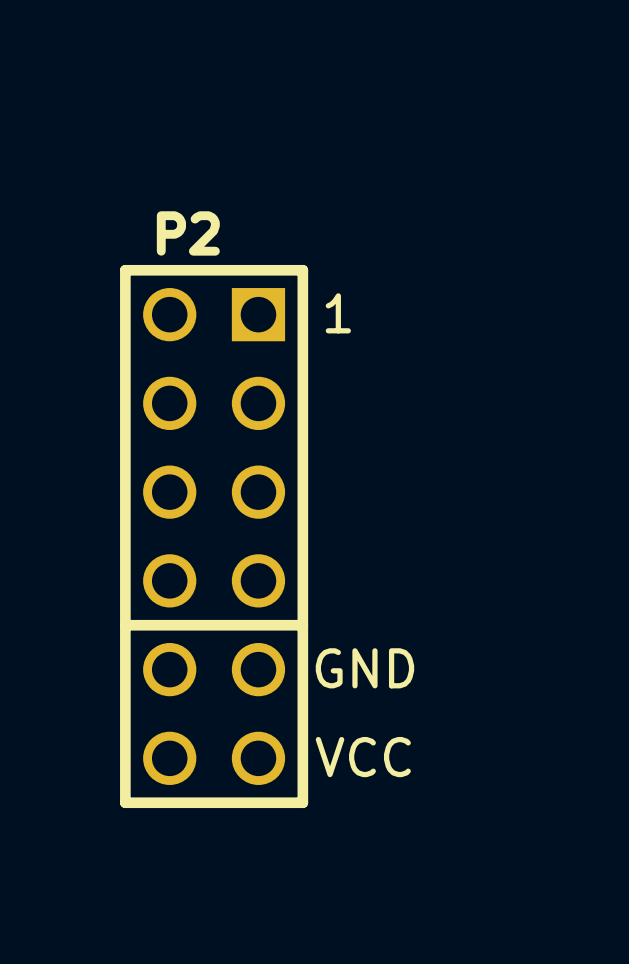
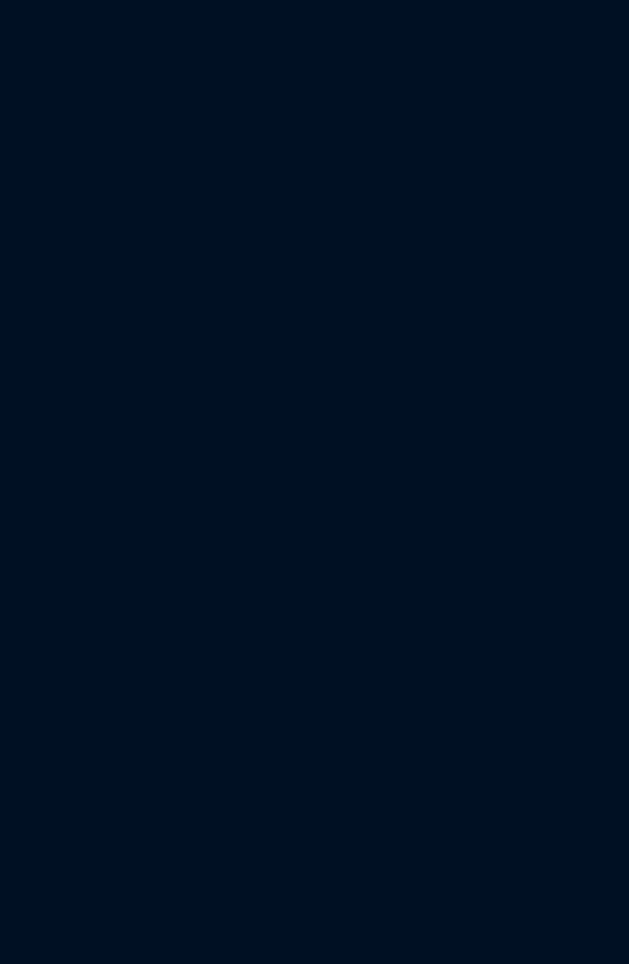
P2: (214, 536) -> none

